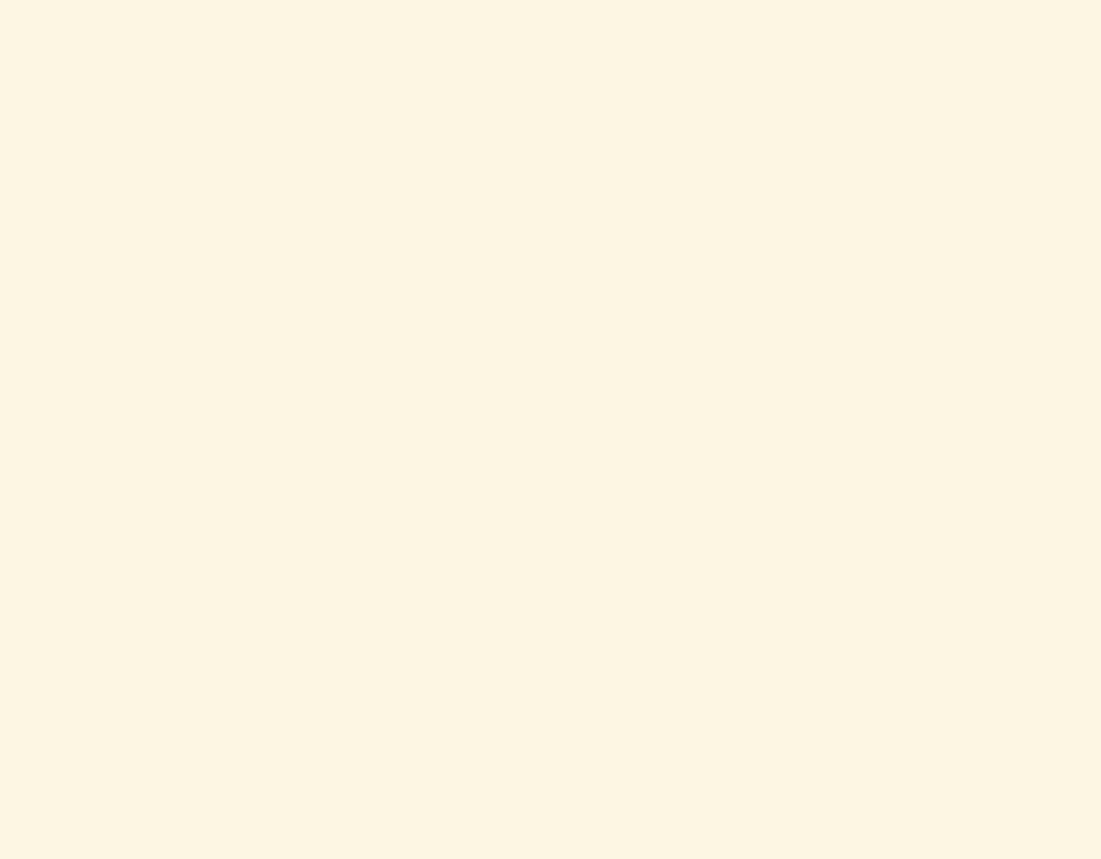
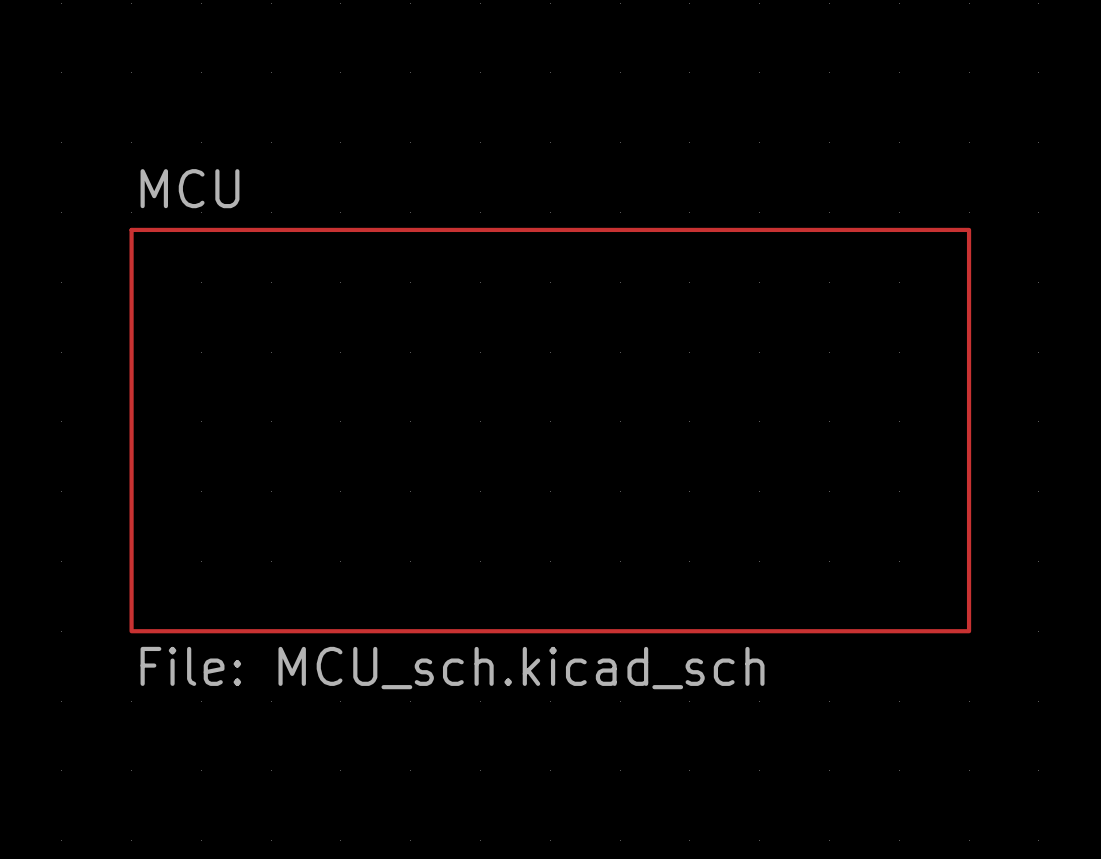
sheet MCU: none -> File: MCU_sch.kicad_sch (550, 430)

